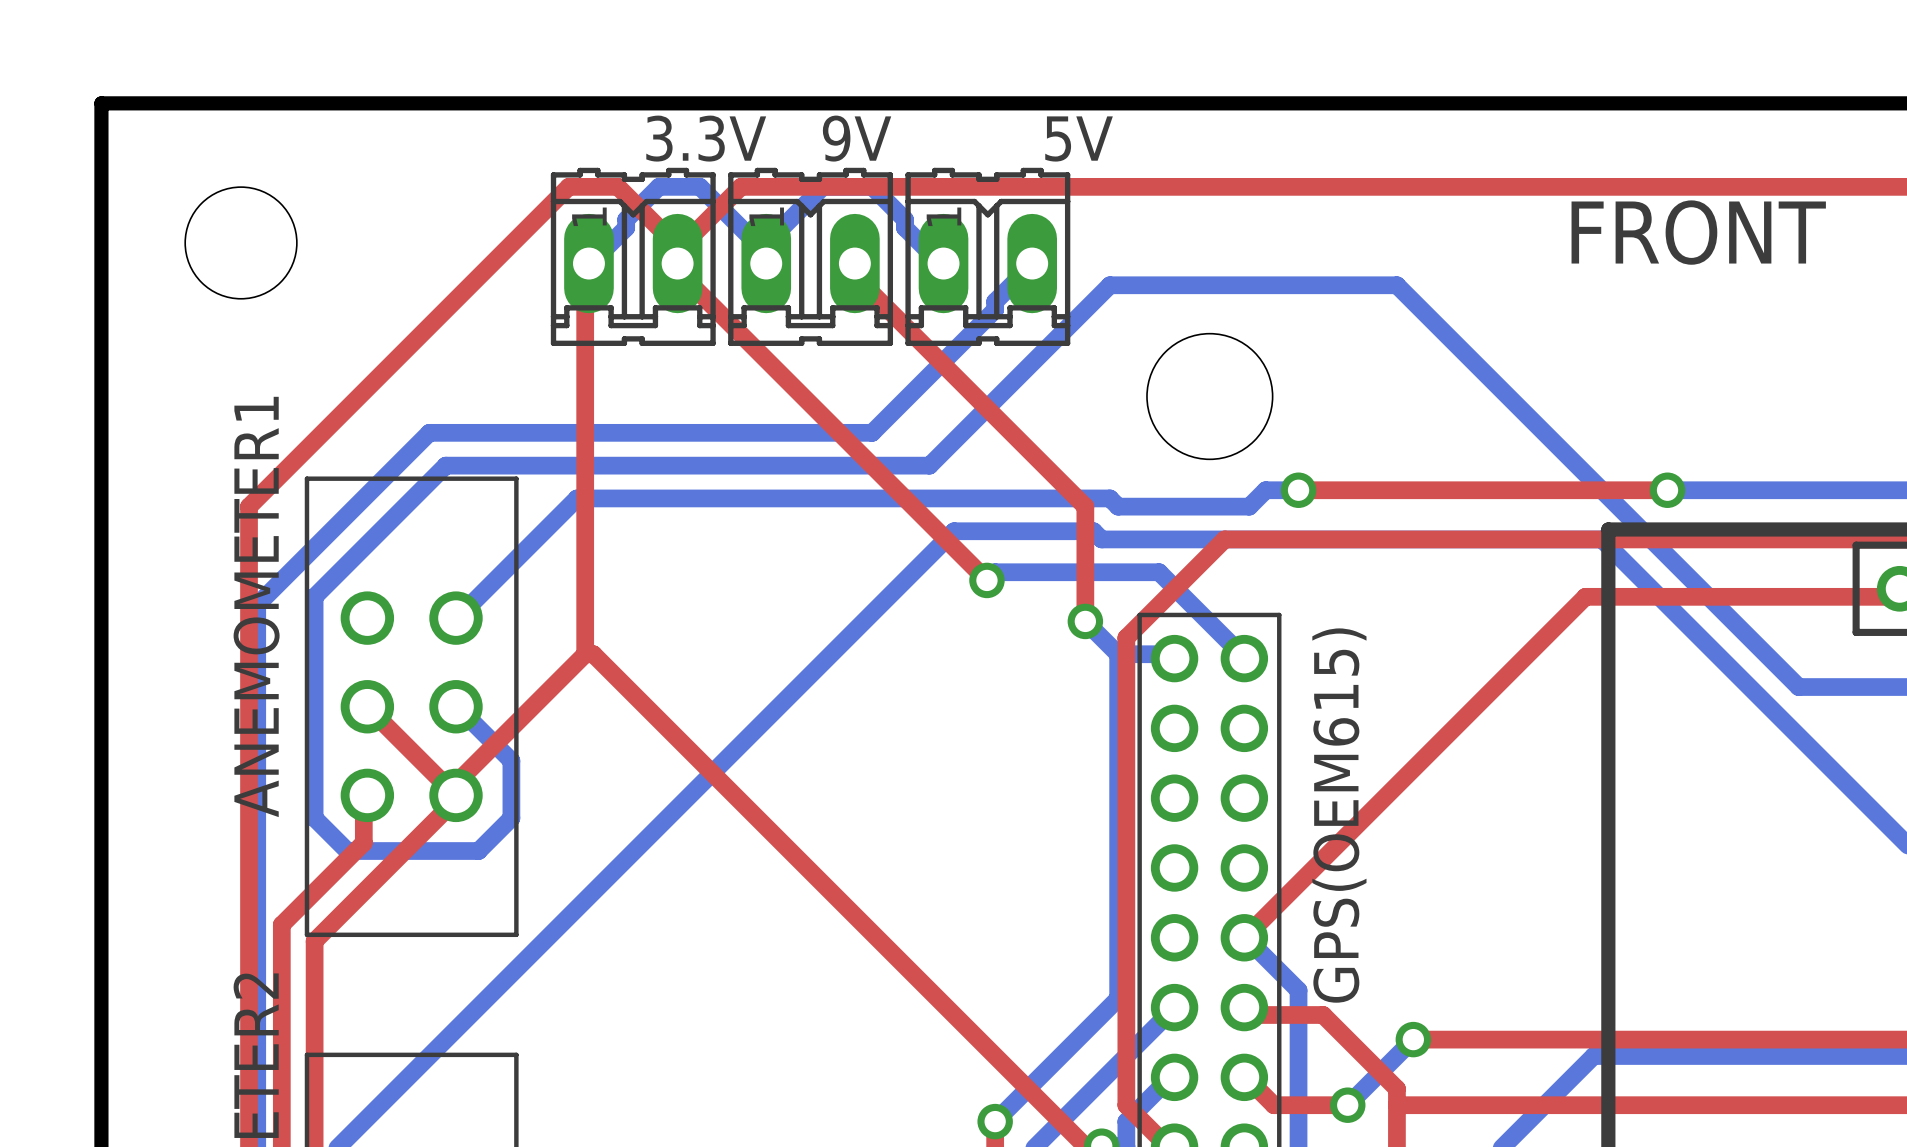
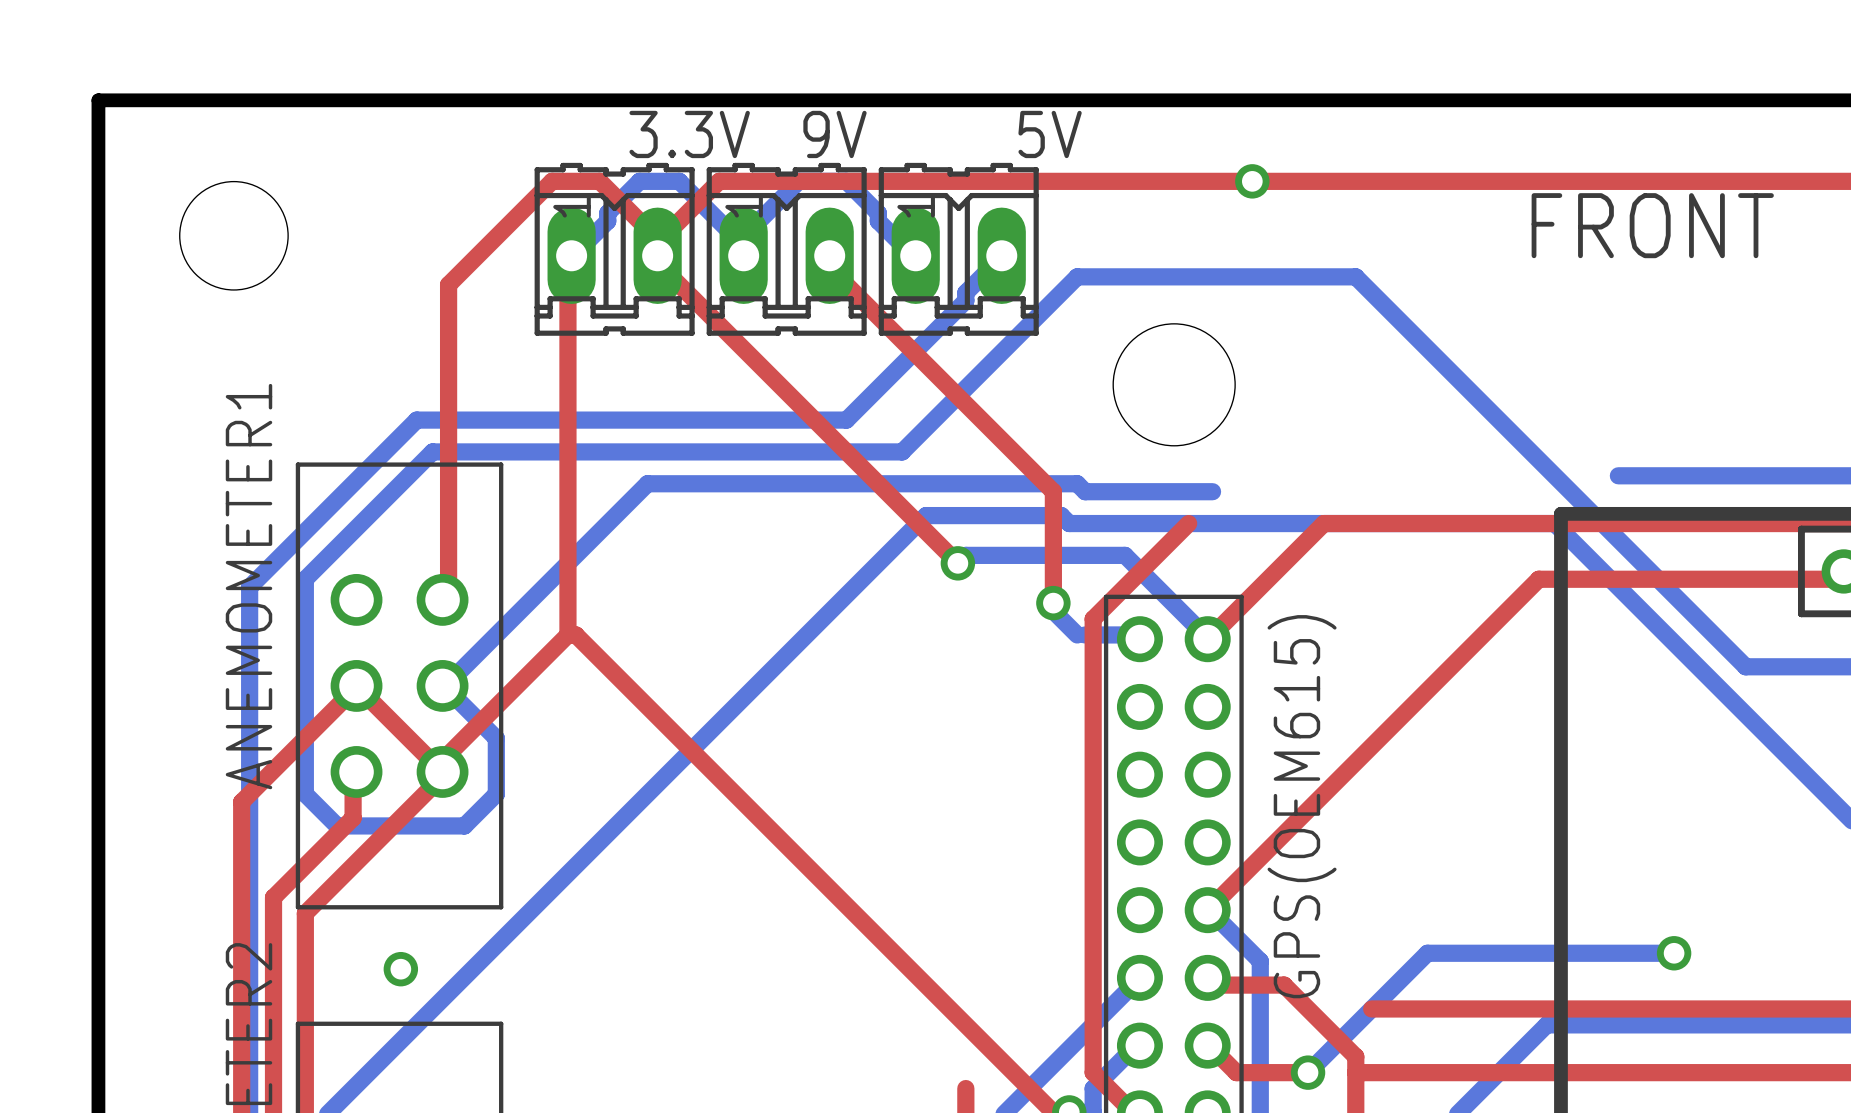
via: none -> (1252, 181)
top track: (462, 293) (249, 506) (249, 826) -> (448, 284) (448, 595) (442, 599)
top track: (1298, 490) (1667, 490) -> none
bottom track: (1298, 490) (1265, 490) (1249, 506) -> none
via: (1298, 490) -> none
via: (1667, 490) -> none
bottom track: (667, 498) (576, 498) (456, 618) -> (647, 483) (448, 682) (442, 685)
top track: (1224, 539) (1364, 539) -> (1207, 639) (1323, 523)
bottom track: none -> (1045, 603) (1077, 634)
bottom track: (1085, 621) (1118, 654) (1118, 998) (995, 1121) -> none
top track: none -> (356, 685) (241, 802)
bottom track: none -> (1674, 953) (1427, 953) (1371, 1008)
via: none -> (1674, 953)
via: none -> (400, 969)
via: (1413, 1039) -> none
via: (995, 1121) -> none

